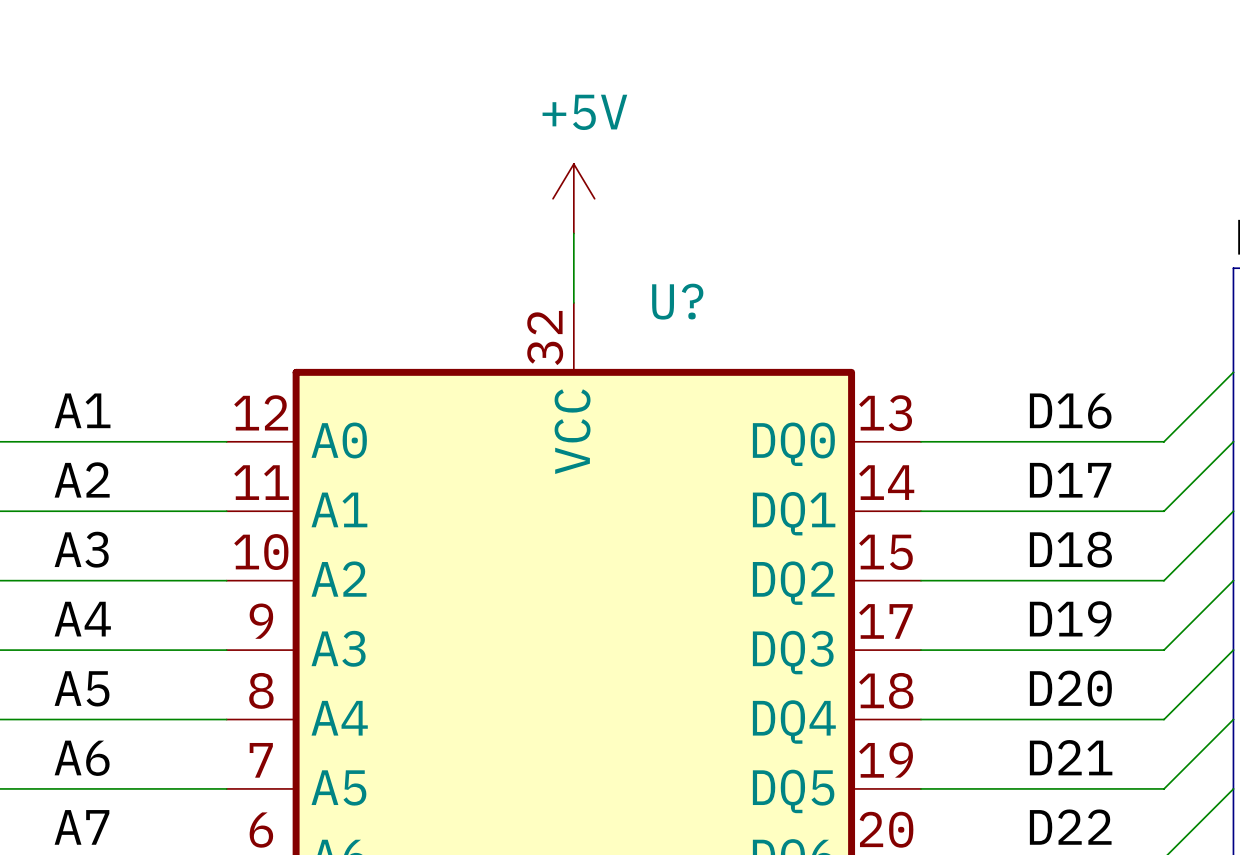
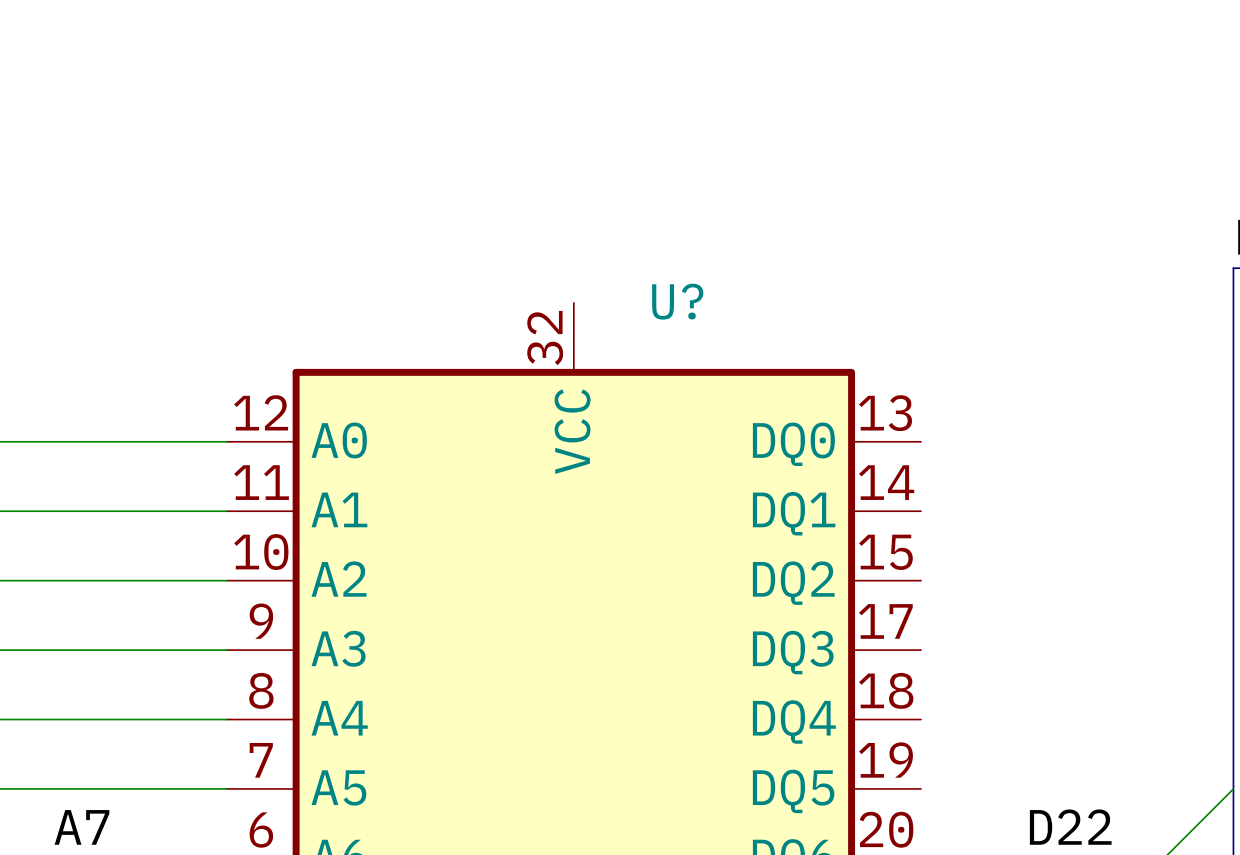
power symbol: +5V (573, 198) -> none
wire: (573, 233) (573, 302) -> none
wire: (1233, 372) (1164, 441) (921, 441) -> none
label: A1 (82, 410) -> none
label: D16 (1070, 411) -> none
wire: (1233, 441) (1164, 511) (921, 511) -> none
label: A2 (82, 479) -> none
label: D17 (1070, 480) -> none
wire: (1233, 511) (1164, 580) (921, 580) -> none
label: A3 (81, 549) -> none
label: D18 (1070, 549) -> none
wire: (1233, 580) (1164, 650) (921, 650) -> none
label: D19 (1070, 618) -> none
label: A4 (82, 619) -> none
wire: (1233, 650) (1164, 719) (921, 719) -> none
label: A5 (82, 688) -> none
label: D20 (1070, 688) -> none
wire: (1233, 719) (1164, 788) (921, 788) -> none
label: D21 (1071, 757) -> none
label: A6 (82, 758) -> none

